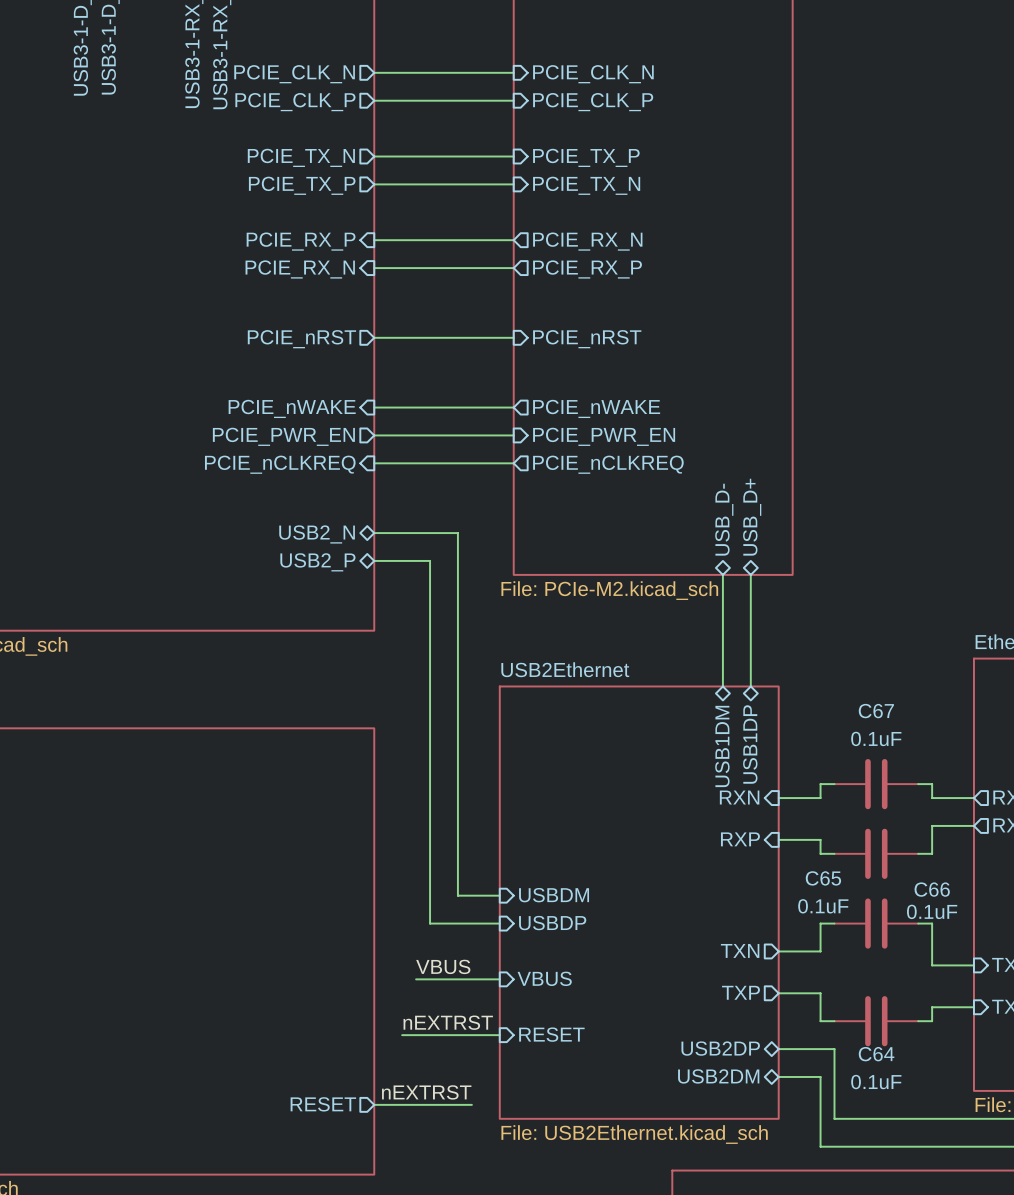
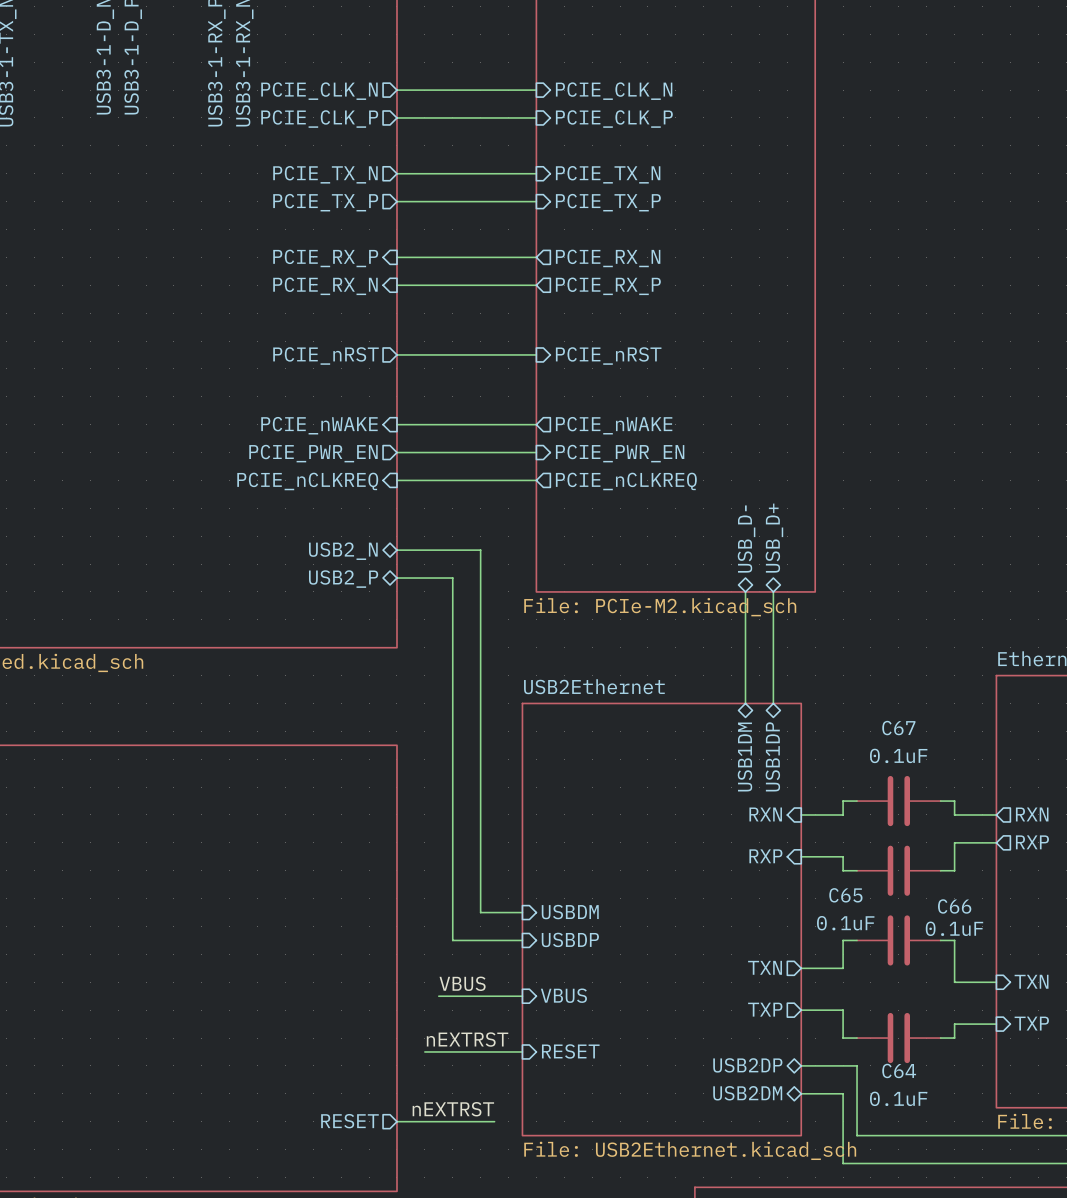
sheet pin: PCIE_TX_P (586, 157) -> PCIE_TX_N (608, 174)
sheet pin: PCIE_TX_N (586, 185) -> PCIE_TX_P (608, 202)

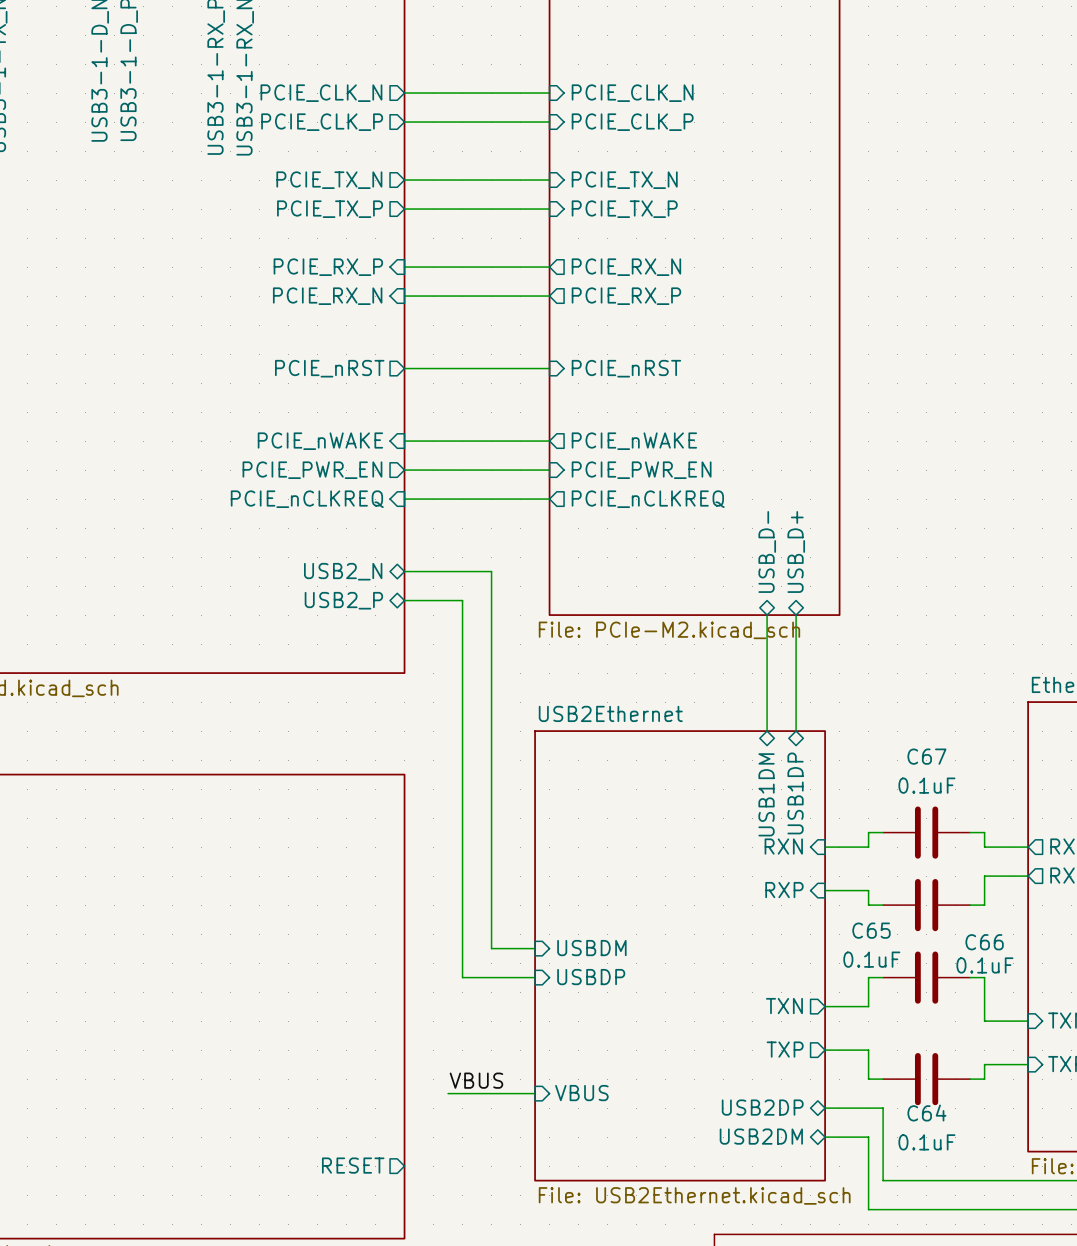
label position: VBUS (462, 983) -> VBUS (476, 1080)
sheet pin: VBUS (563, 995) -> none
wire: (438, 996) (522, 996) -> none
label: nEXTRST (467, 1039) -> none
wire: (424, 1051) (438, 1051) -> none
sheet pin: RESET (570, 1051) -> VBUS (581, 1093)
label: nEXTRST (453, 1109) -> none
wire: (396, 1121) (494, 1121) -> none

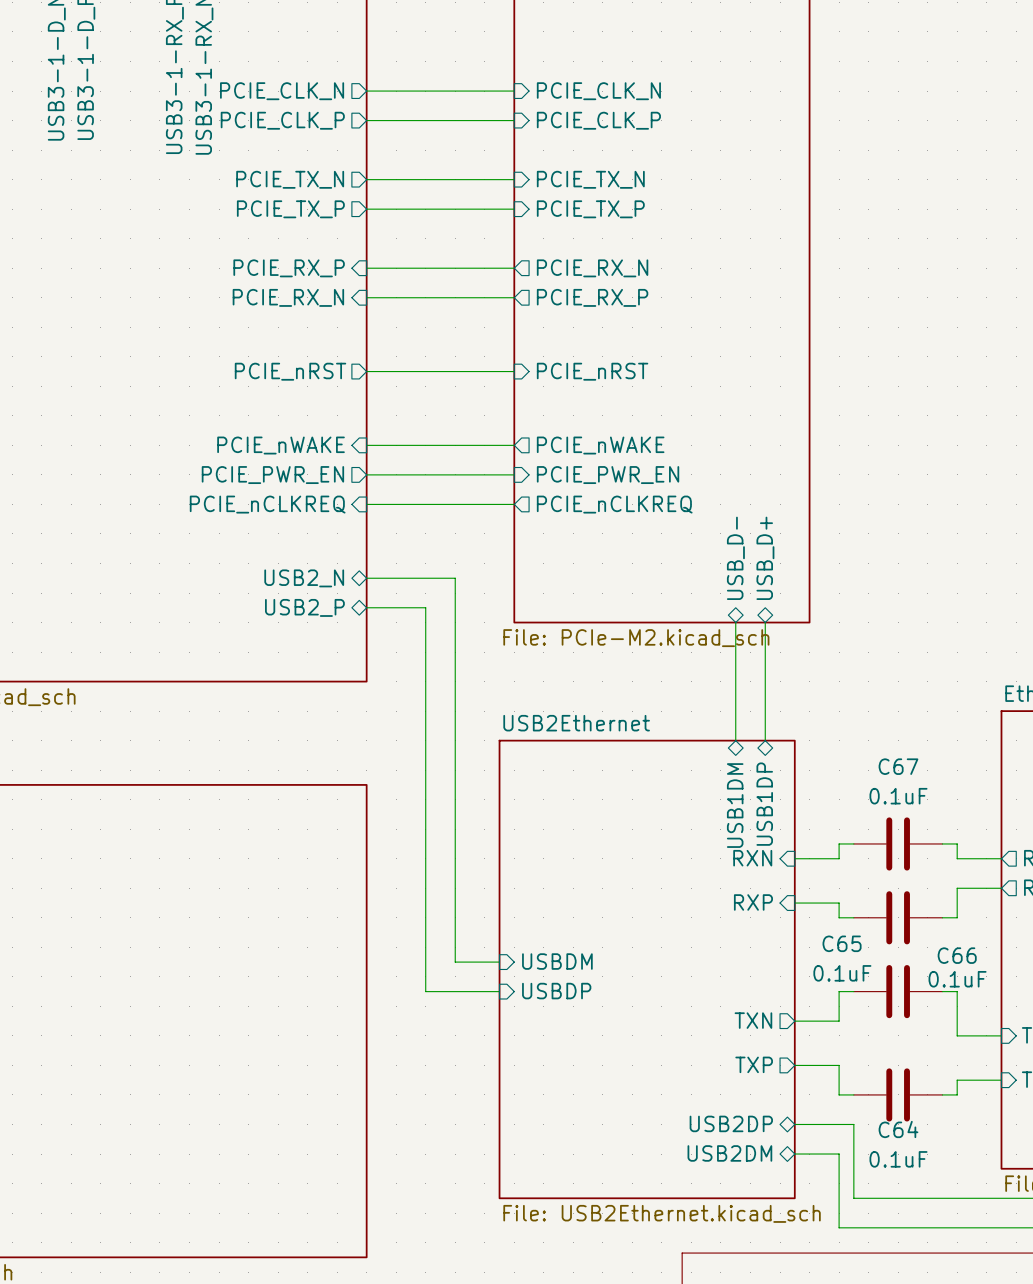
label: VBUS (476, 1080) -> none
wire: (448, 1093) (535, 1093) -> none
sheet pin: VBUS (581, 1093) -> none
sheet pin: RESET (353, 1165) -> none

